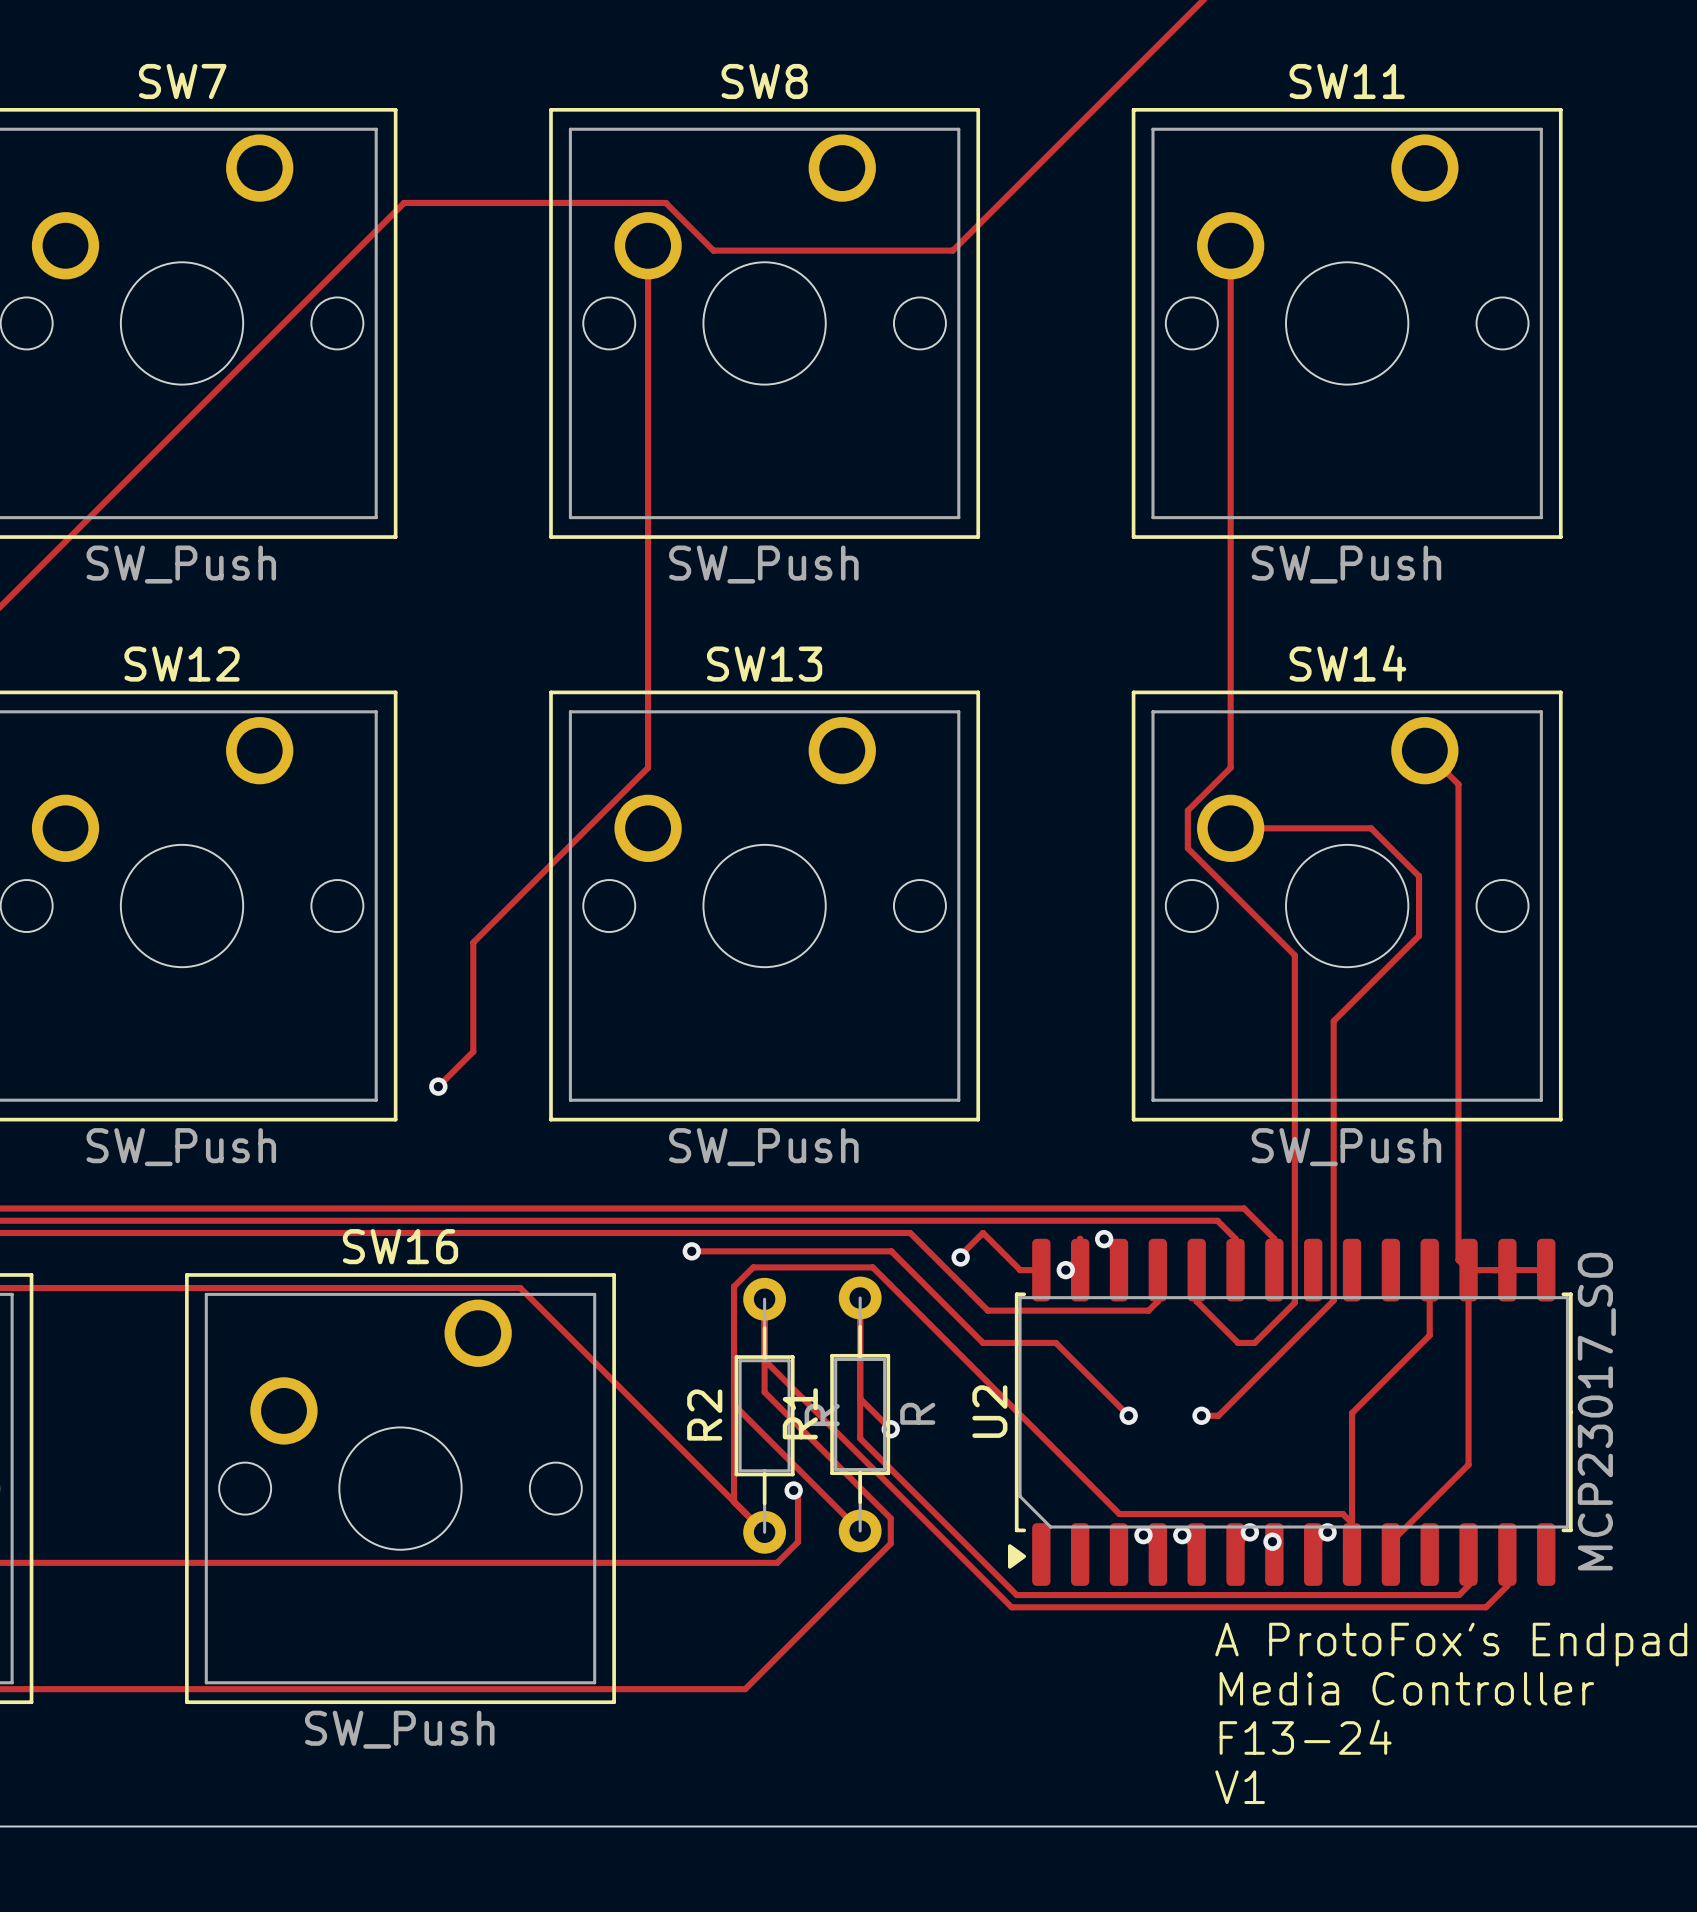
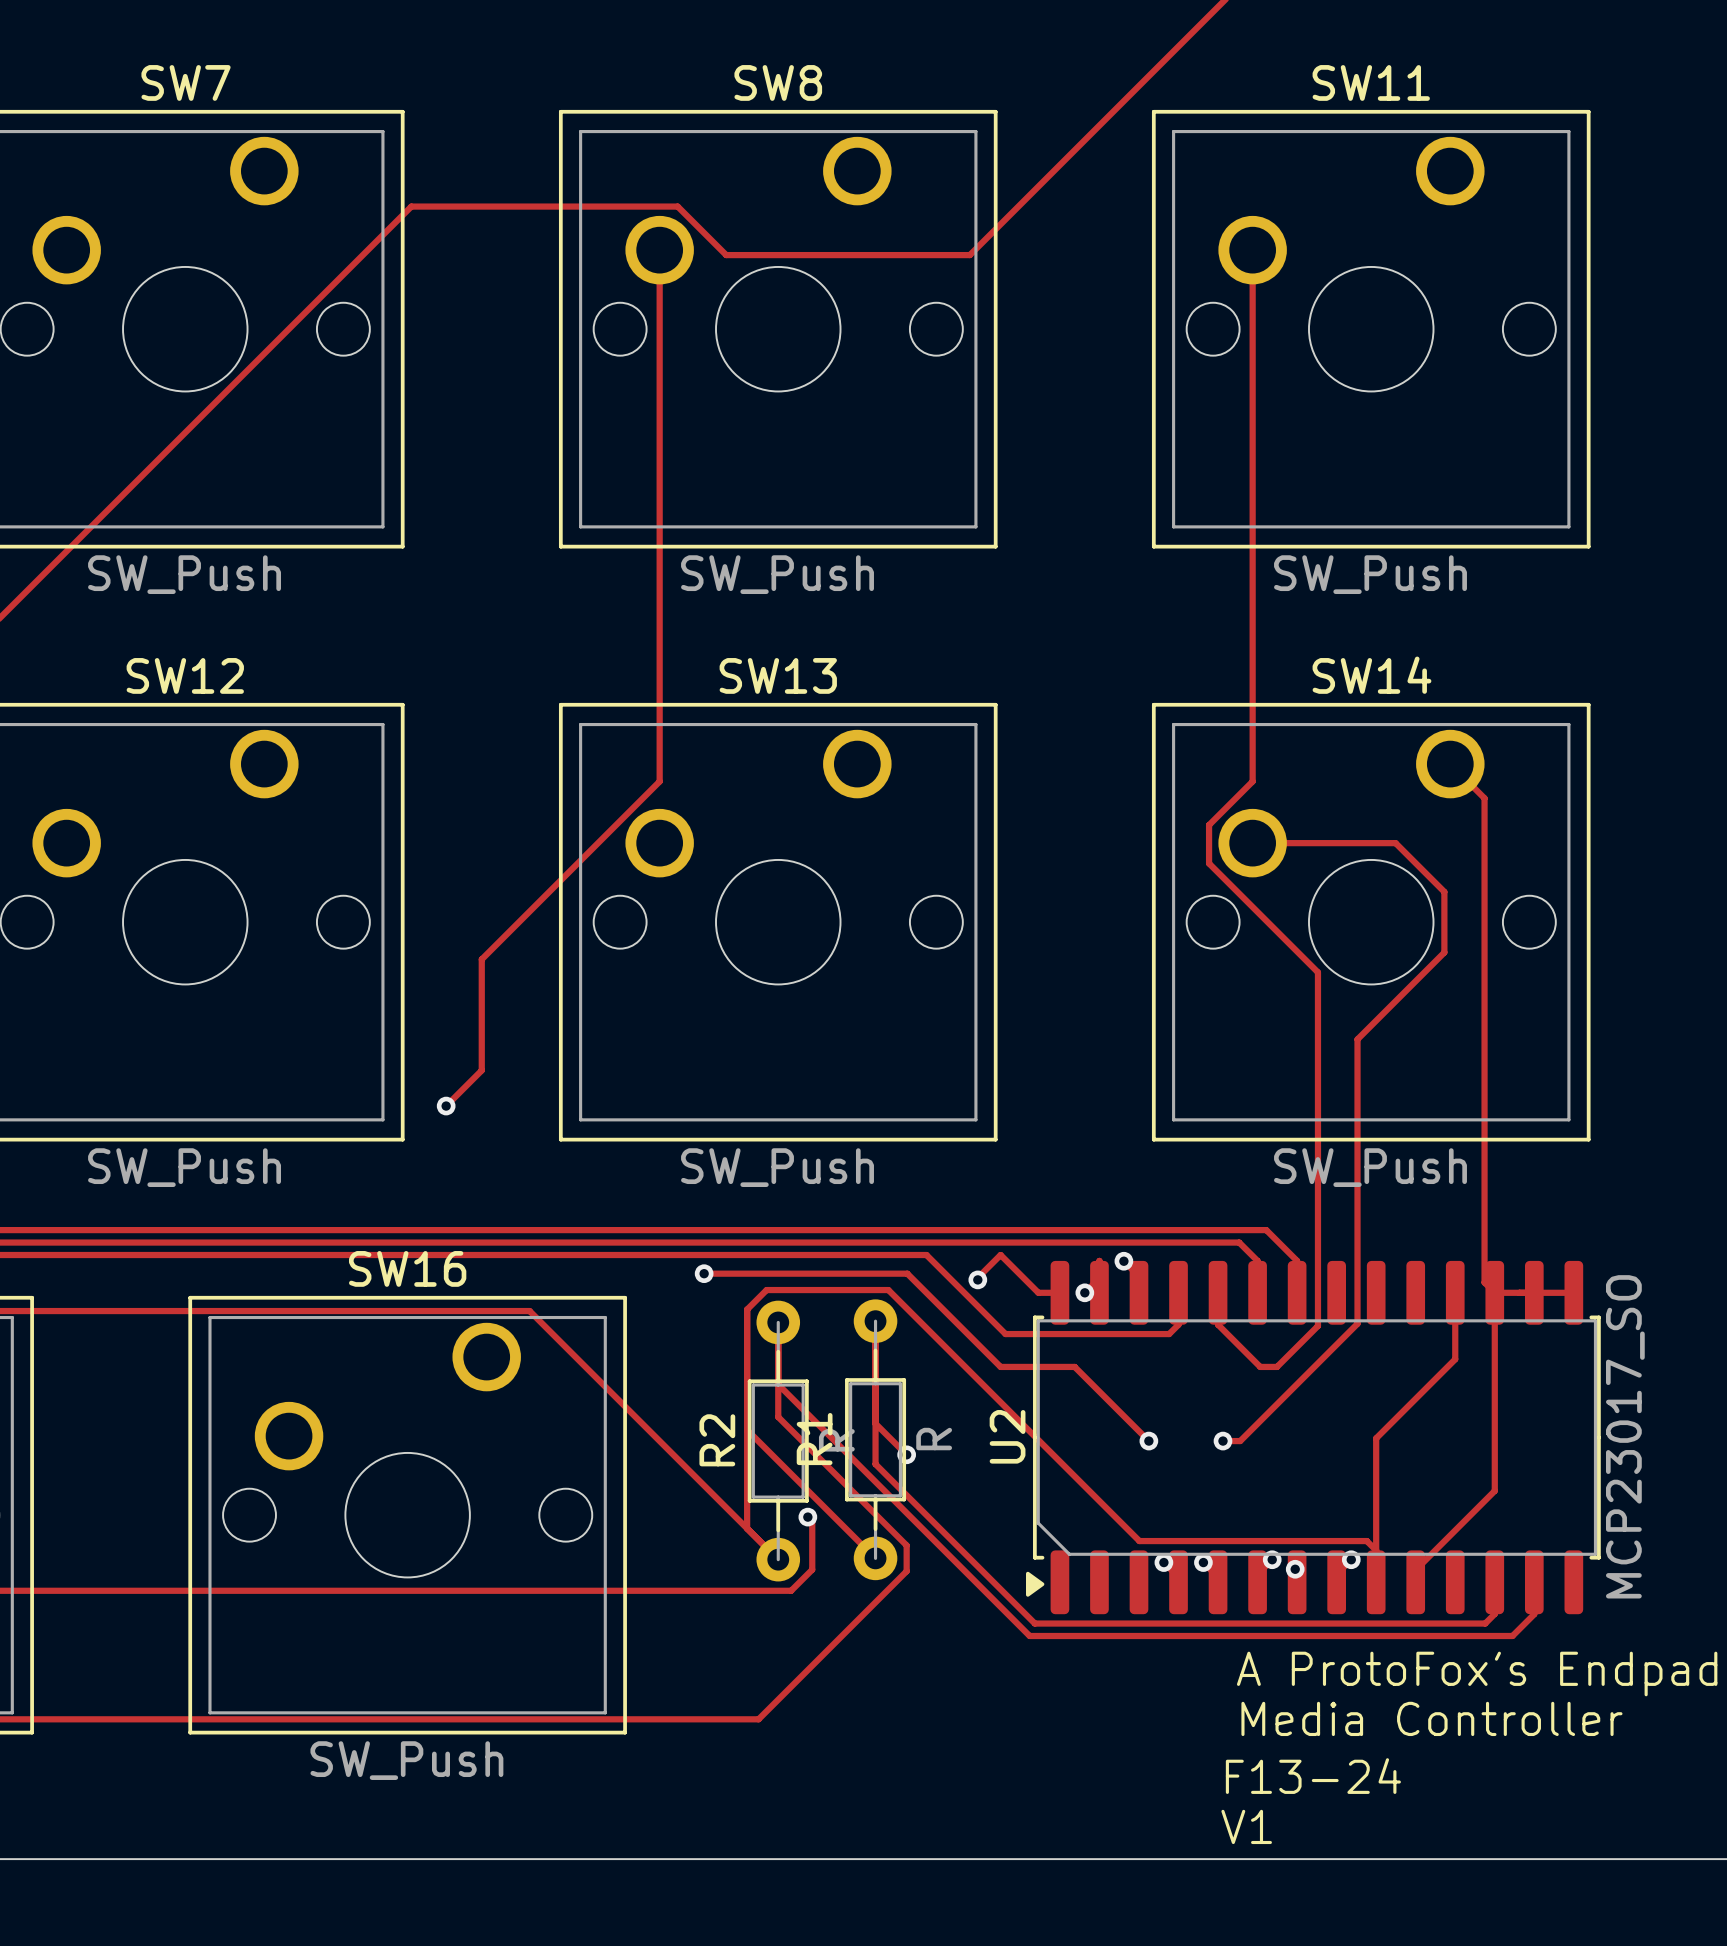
text position: F13-24 (1305, 1737) -> F13-24 (1313, 1776)
text position: V1 (1240, 1787) -> V1 (1246, 1826)

